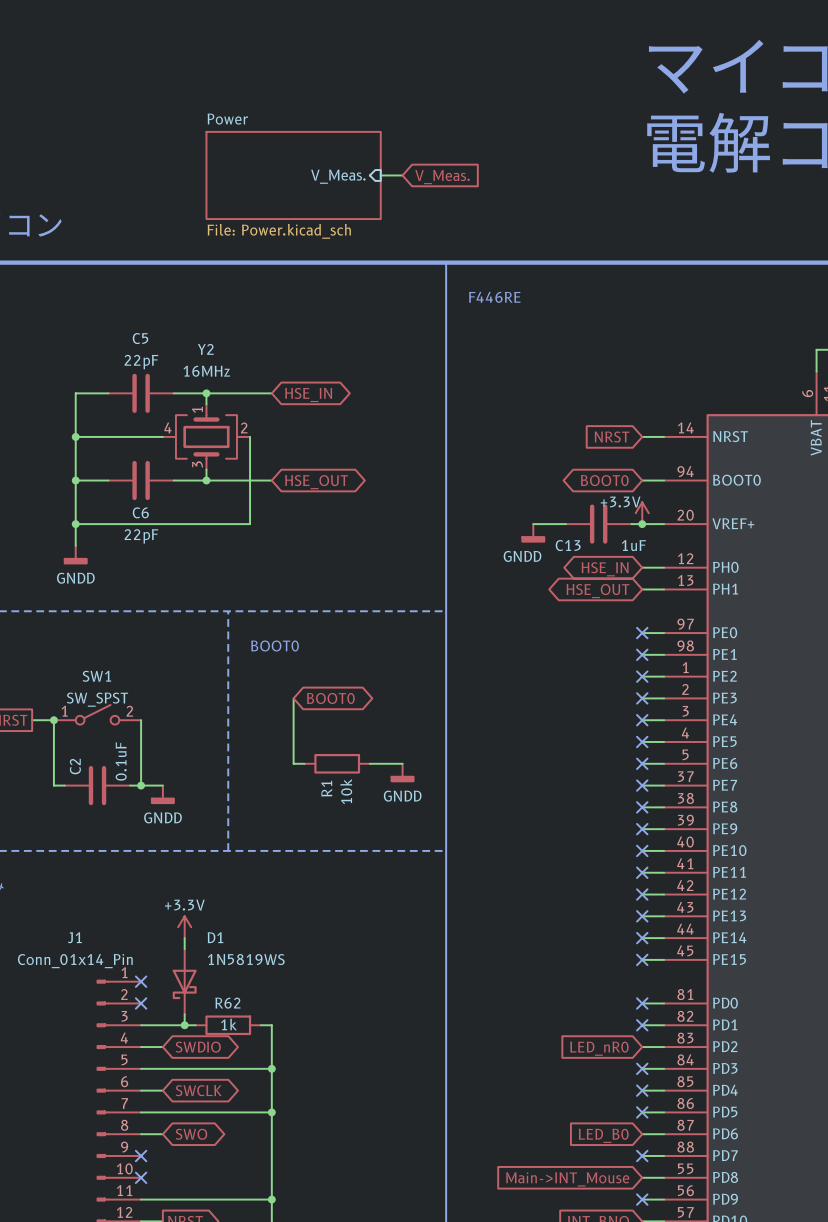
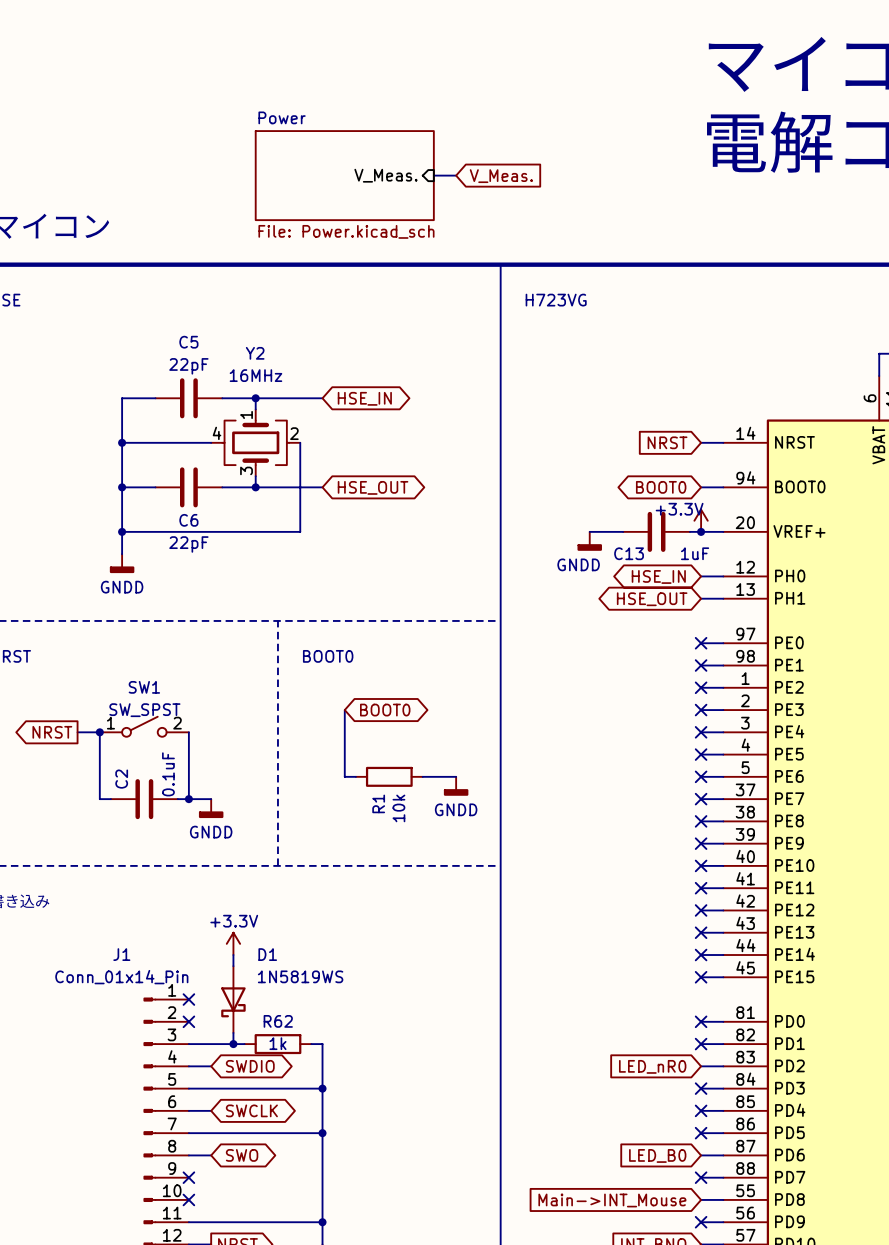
text: F446RE (494, 297) -> H723VG (556, 300)

